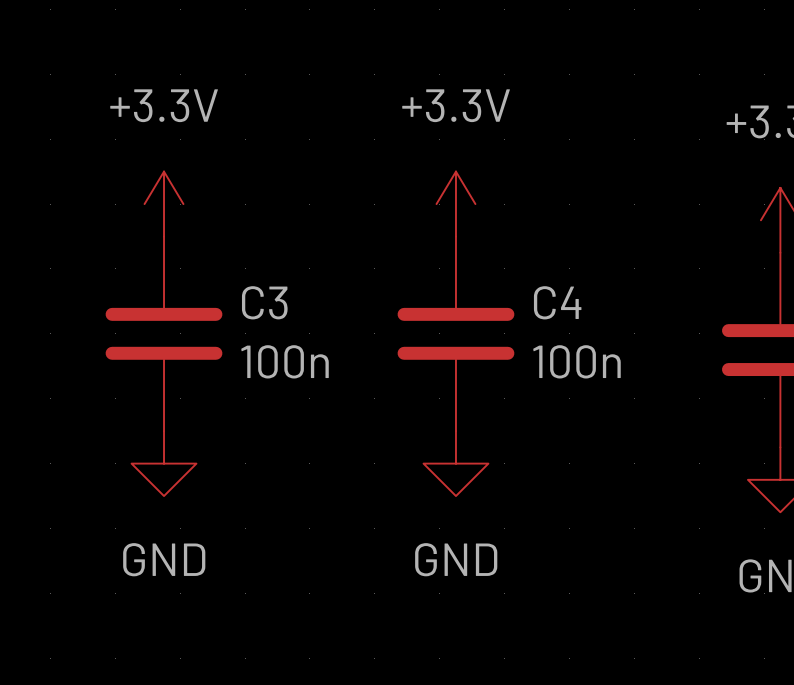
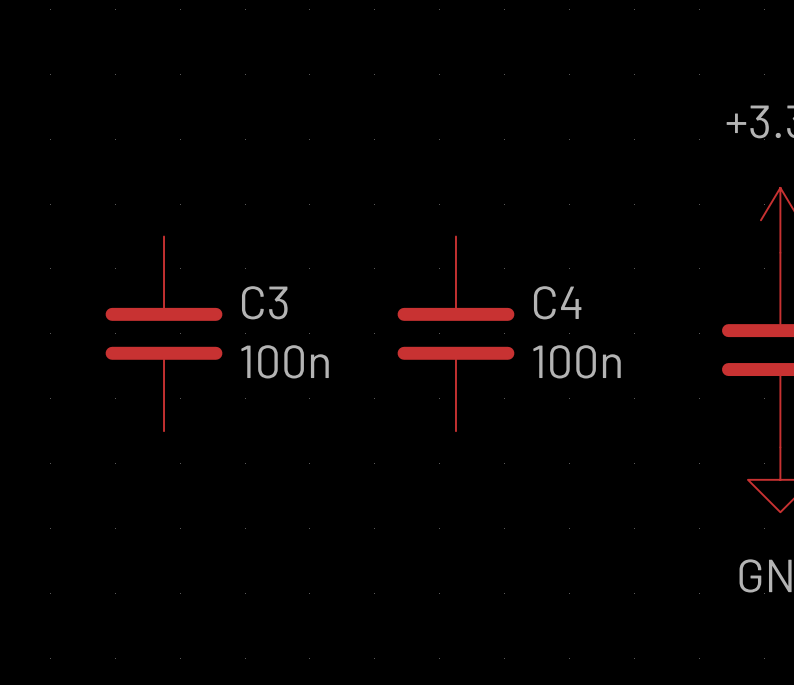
power symbol: +3.3V (164, 204) -> none
power symbol: +3.3V (455, 204) -> none
power symbol: GND (164, 463) -> none
power symbol: GND (455, 463) -> none

